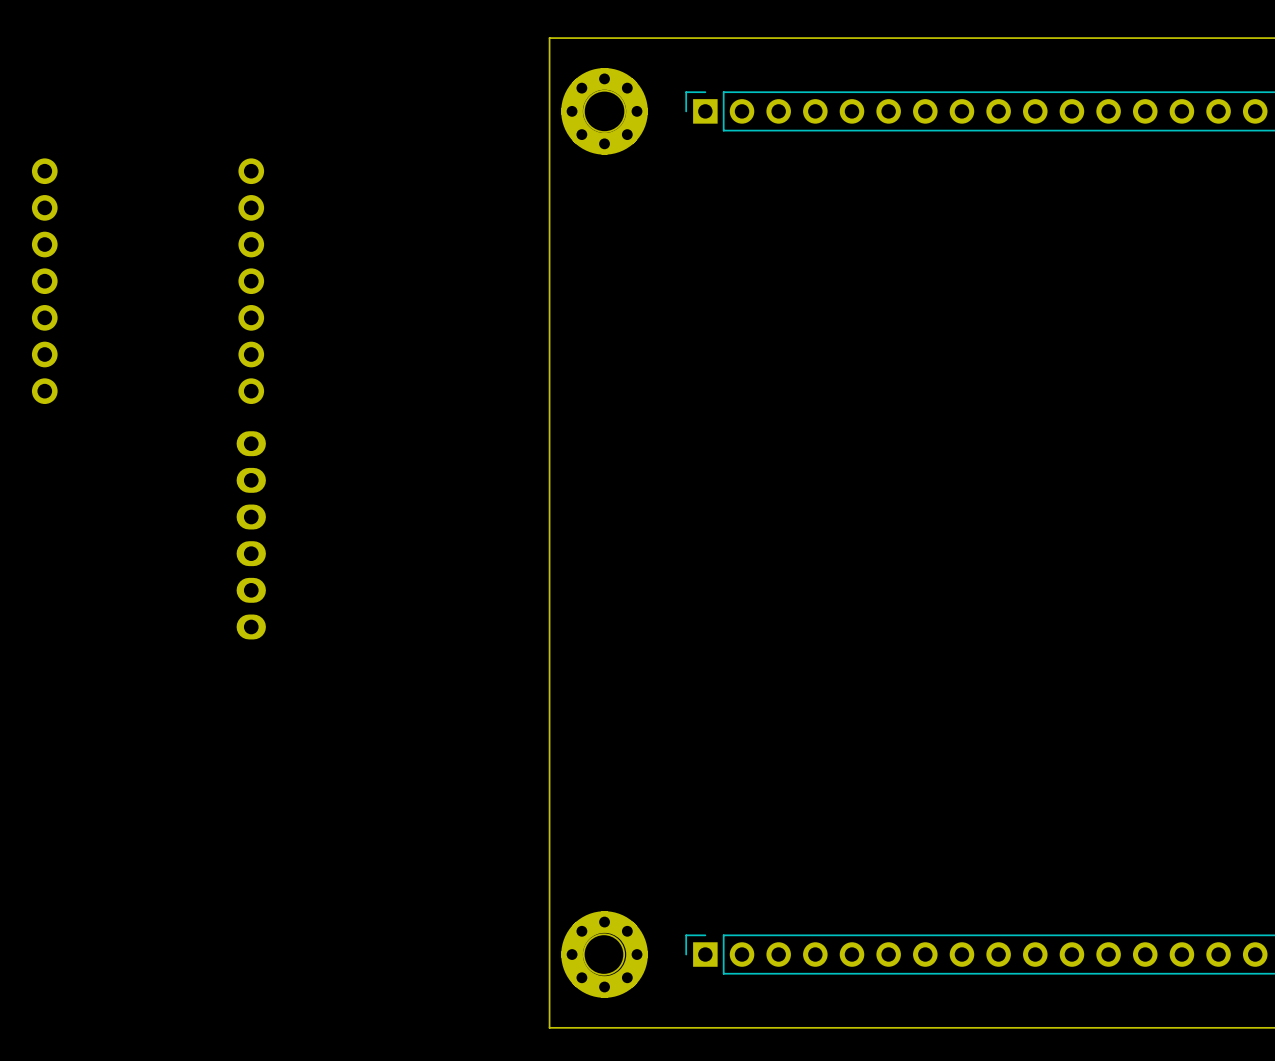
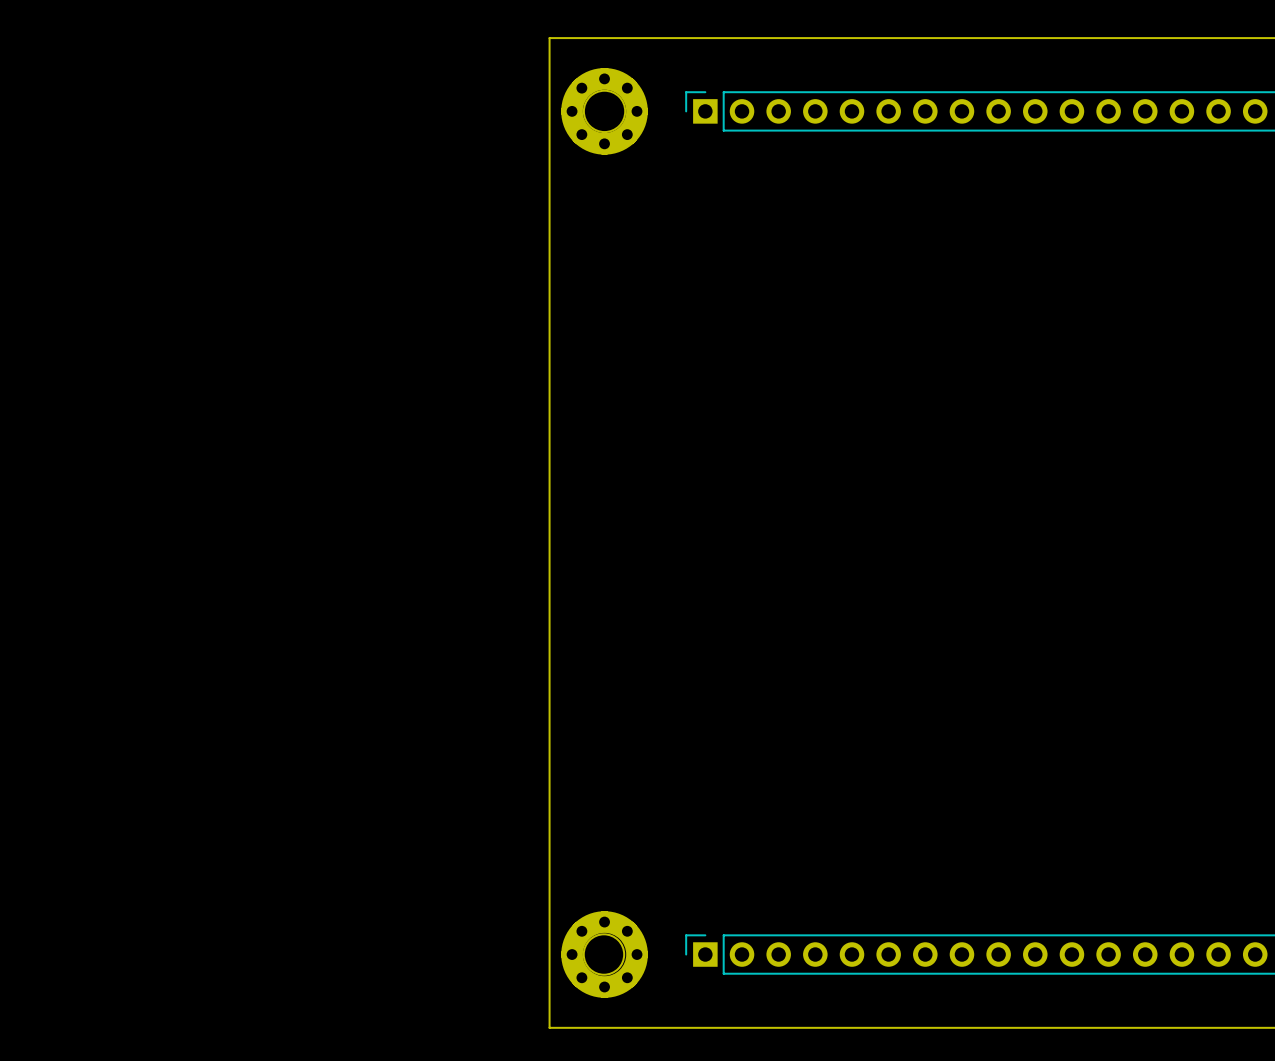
part: (44, 281) -> none
part: (251, 281) -> none
part: (251, 535) -> none

